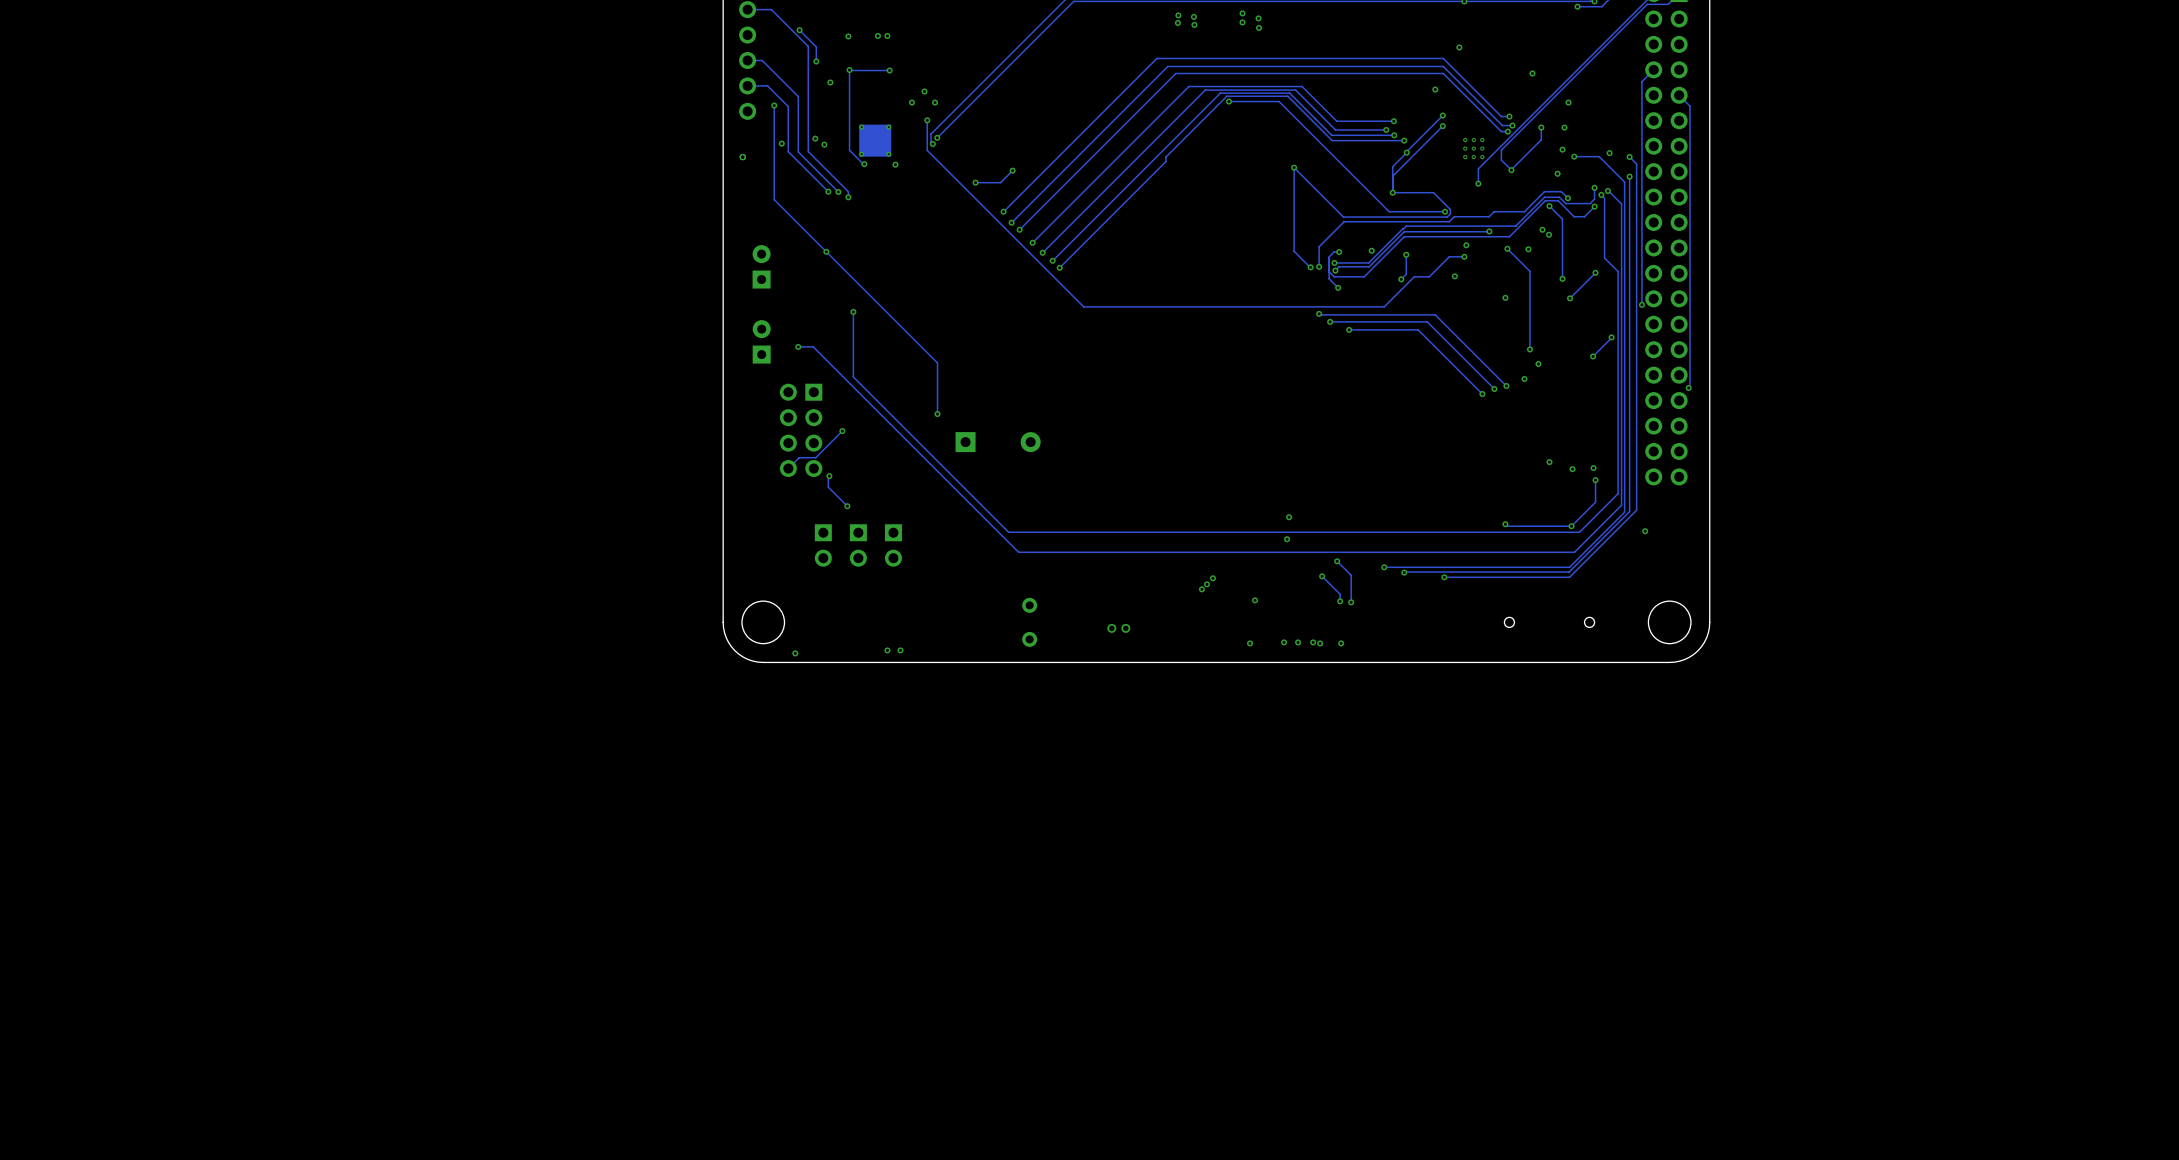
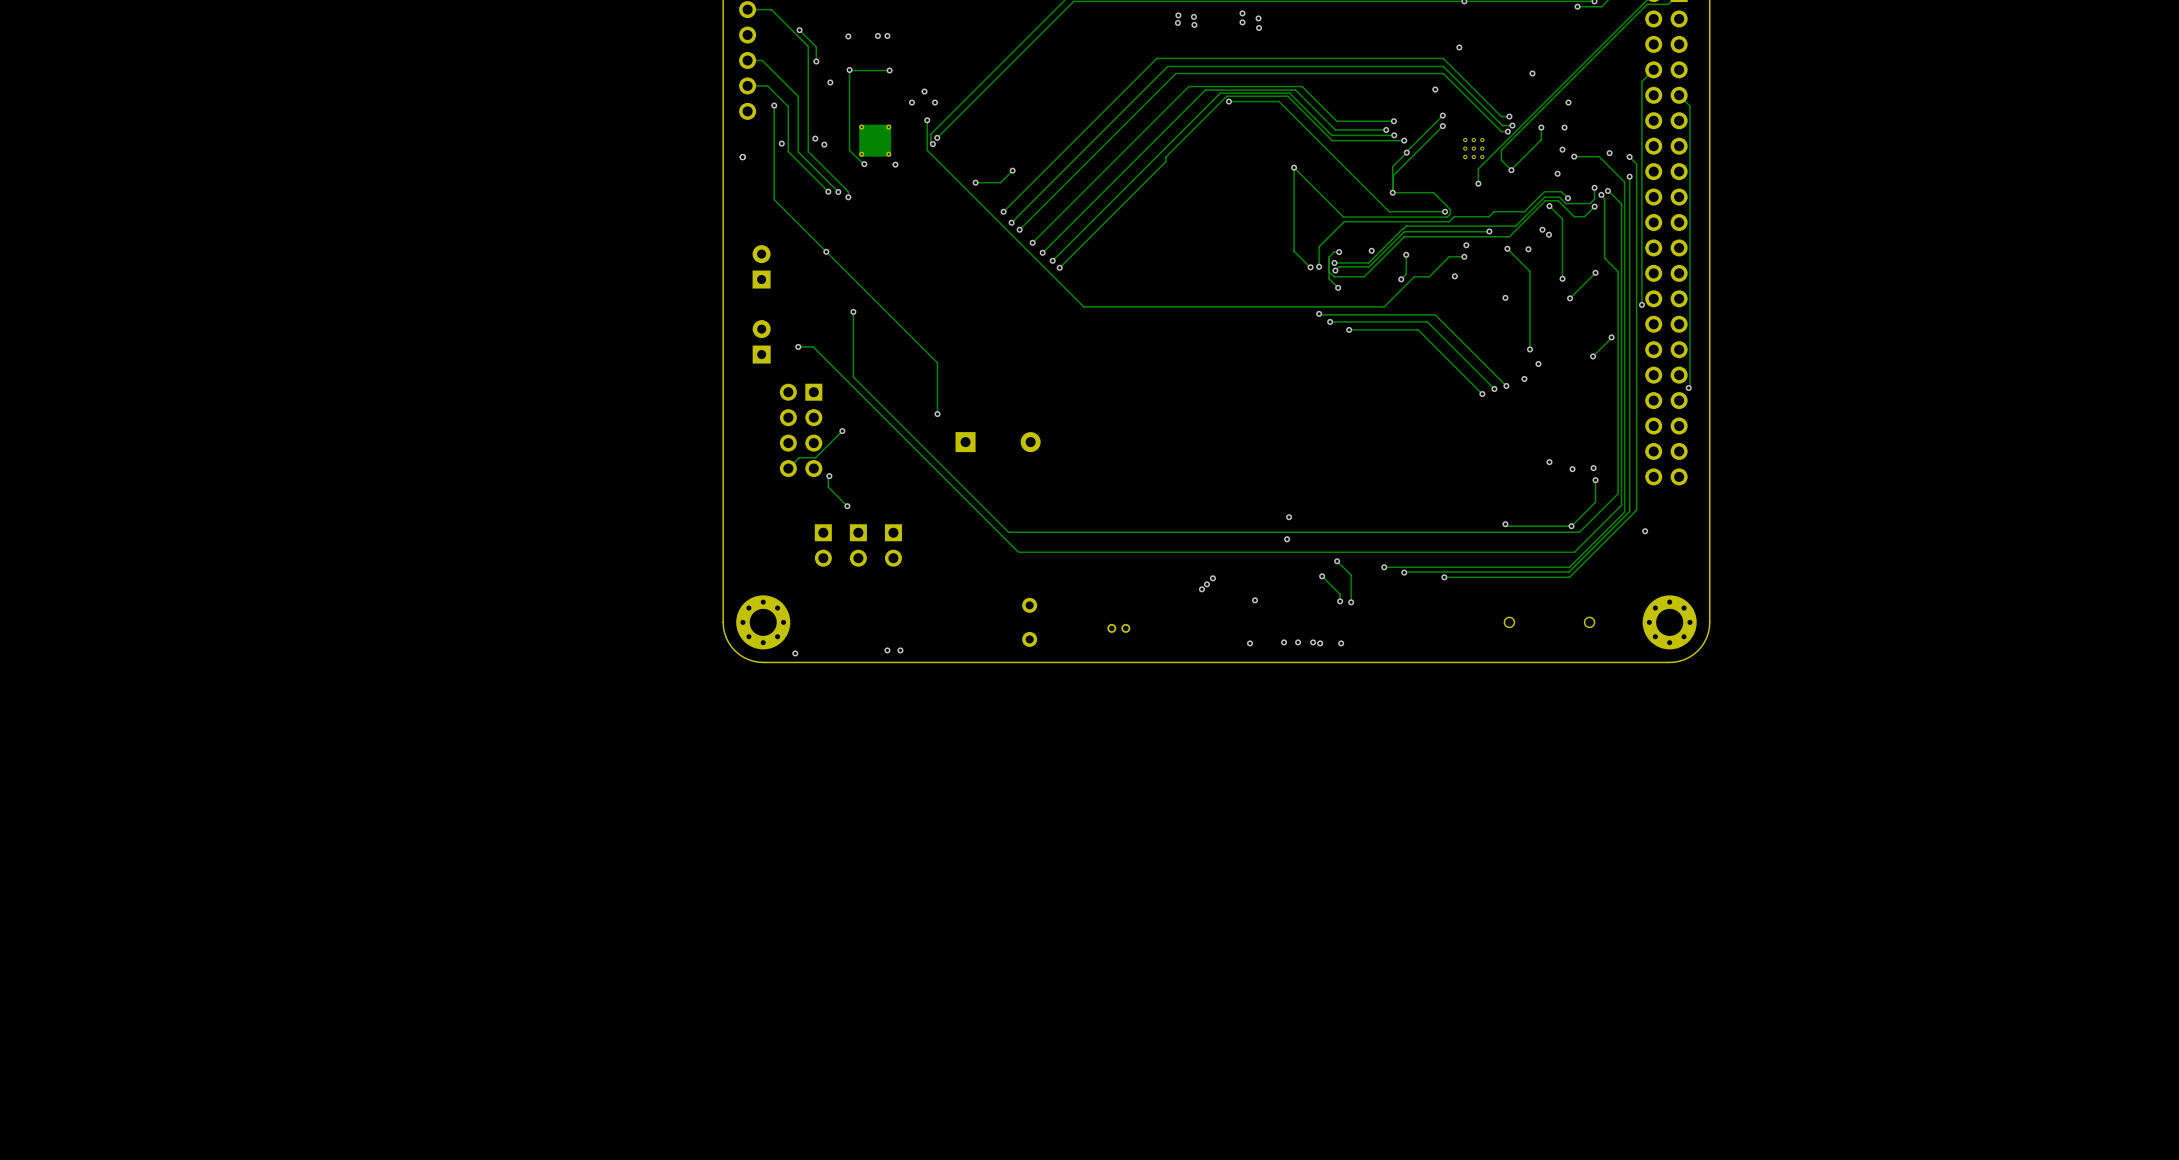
round board edge: [741, 600, 785, 644] -> none
round board edge: [1648, 600, 1692, 644] -> none
part: none -> (763, 622)
part: none -> (1669, 622)

